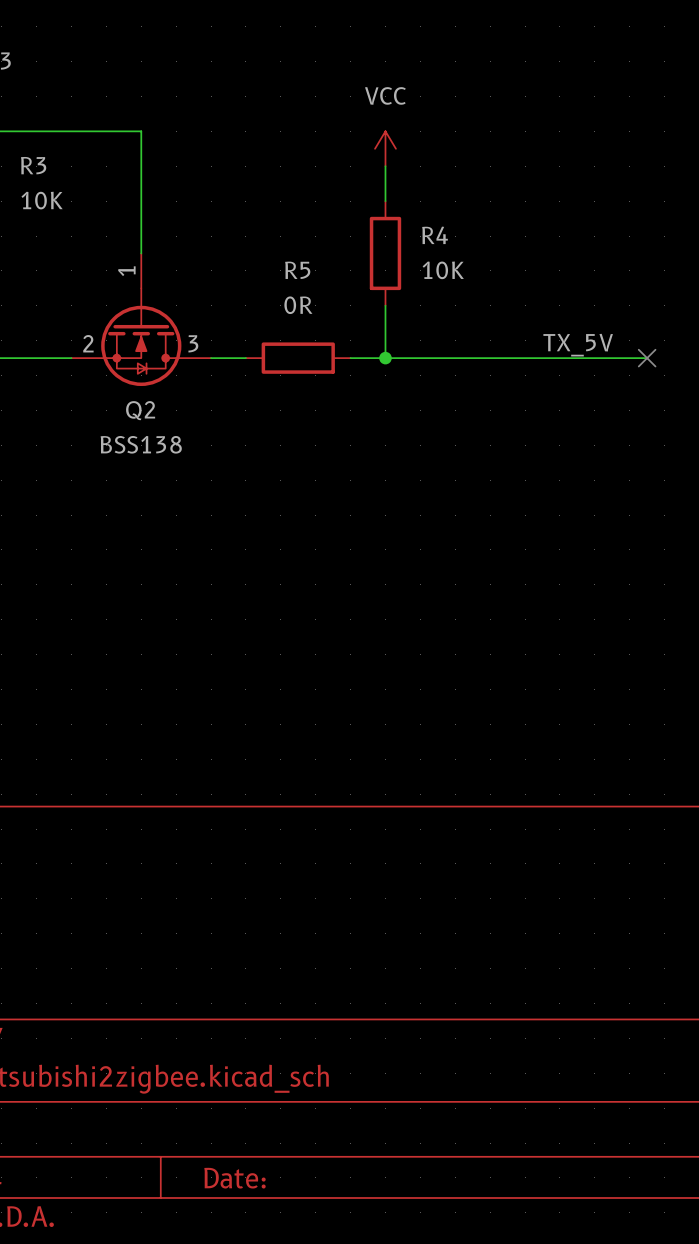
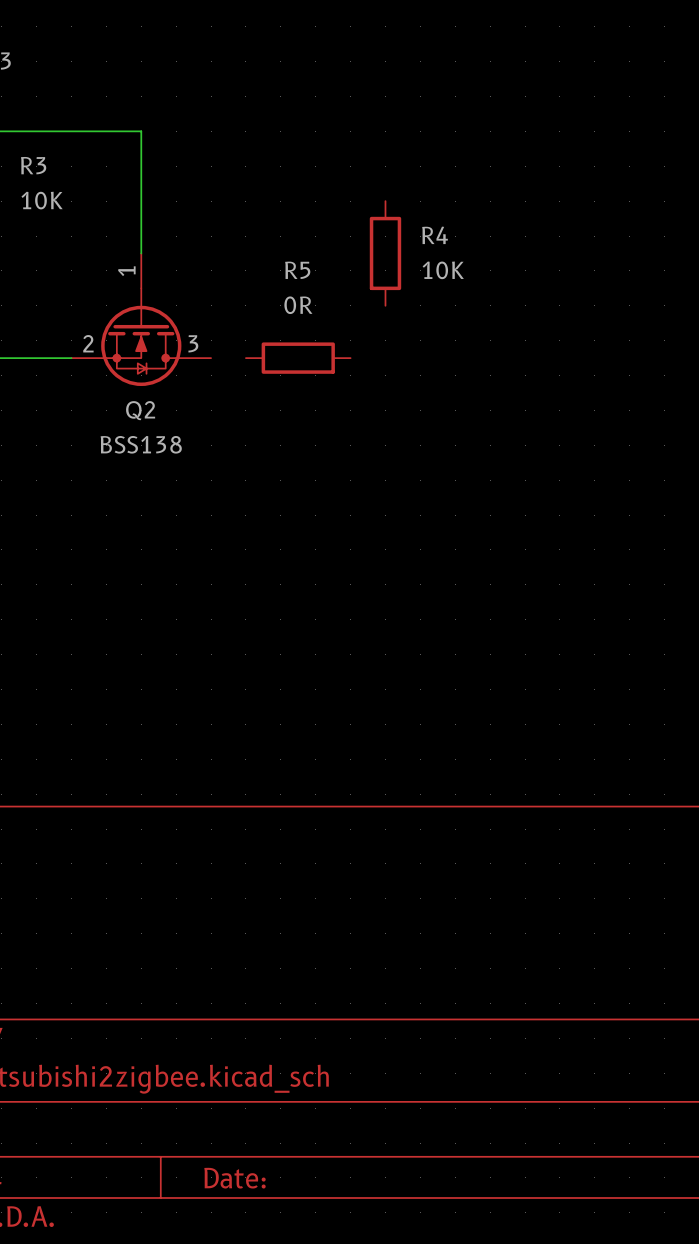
power symbol: VCC (385, 148) -> none
wire: (385, 166) (385, 201) -> none
wire: (385, 305) (385, 358) -> none
label: TX_5V (578, 345) -> none
wire: (211, 358) (245, 358) -> none
wire: (350, 358) (647, 358) -> none
junction: (385, 358) -> none
no-connect mark: (647, 358) -> none

